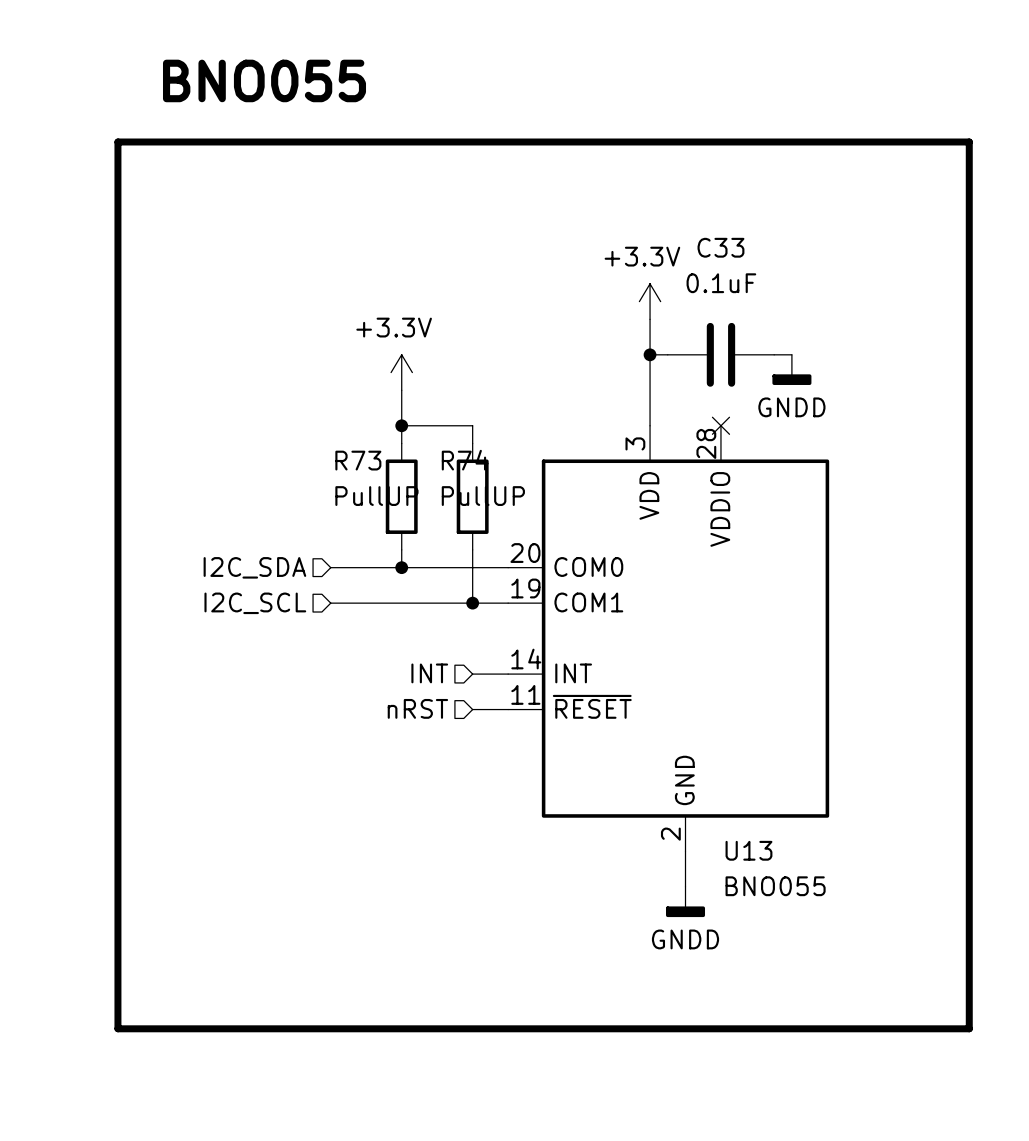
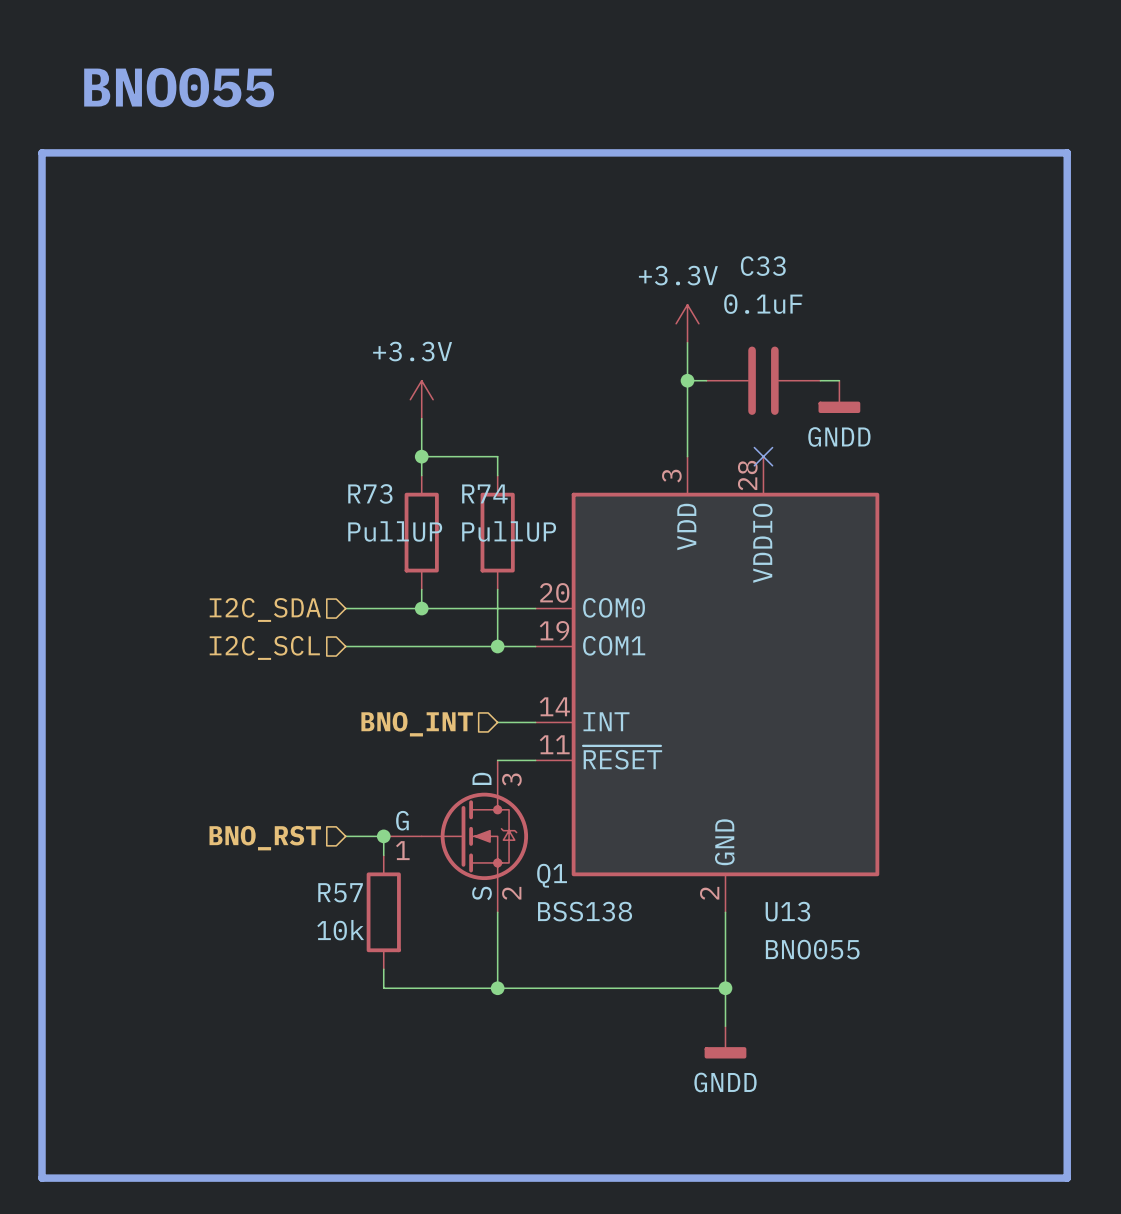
text position: BNO055 (264, 80) -> BNO055 (179, 87)
line: (117, 141) (117, 1028) (969, 1028) (969, 141) -> (117, 152) (42, 152) (42, 1178) (1067, 1178) (1067, 152) (1029, 152)
hierarchical label: INT (429, 673) -> BNO_INT (417, 724)
hierarchical label: nRST (417, 708) -> none
hierarchical label: none -> BNO_RST (265, 838)
wire: none -> (345, 836) (383, 836) (383, 855)
junction: none -> (383, 836)
Q1: none -> BSS138 (455, 836)
R57: none -> 10k (383, 912)
wire: none -> (497, 912) (497, 988)
wire: none -> (725, 950) (725, 1026)
power symbol position: GNDD (685, 901) -> GNDD (725, 1042)
wire: none -> (383, 969) (383, 988) (725, 988)
junction: none -> (497, 988)
junction: none -> (725, 988)

